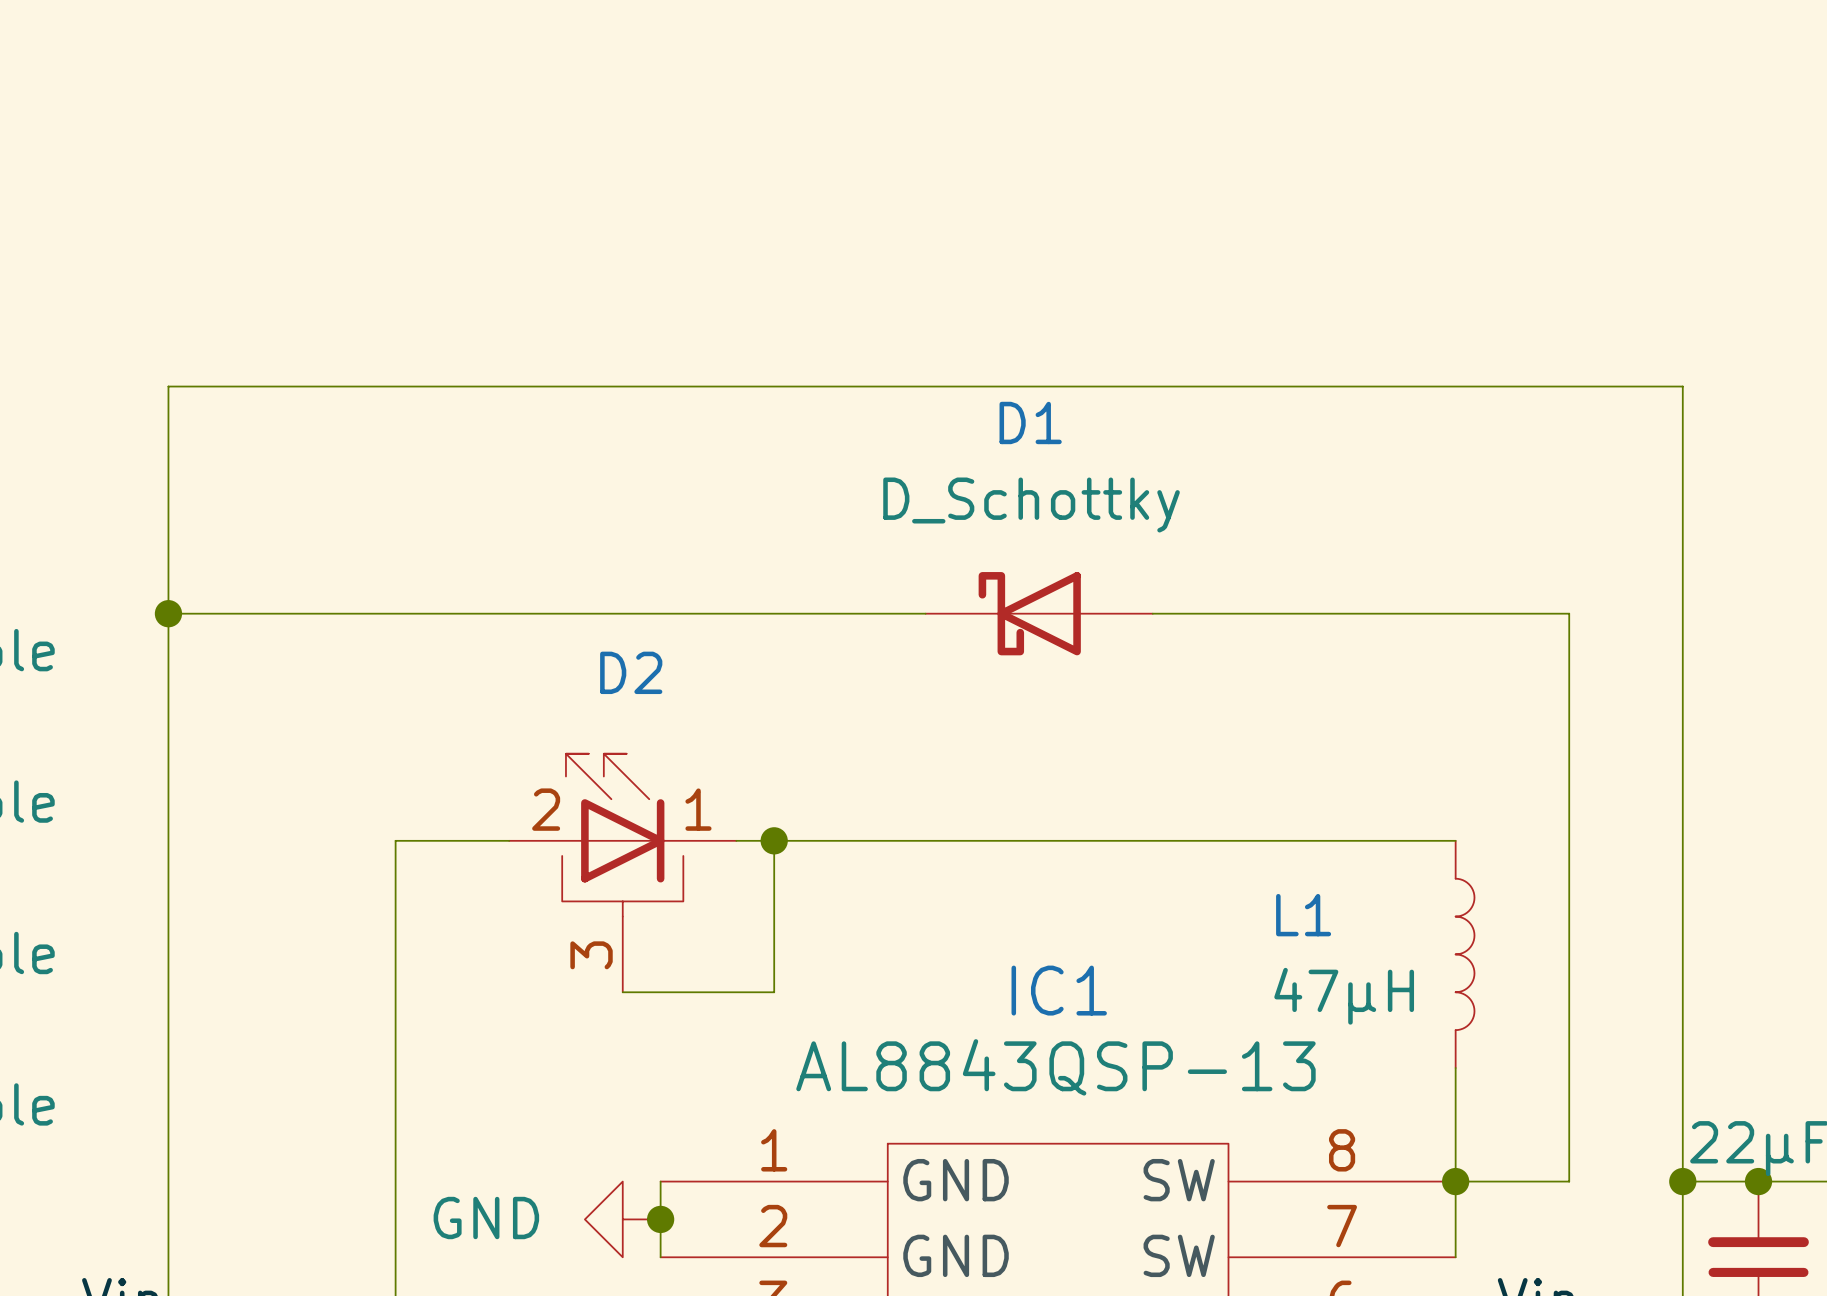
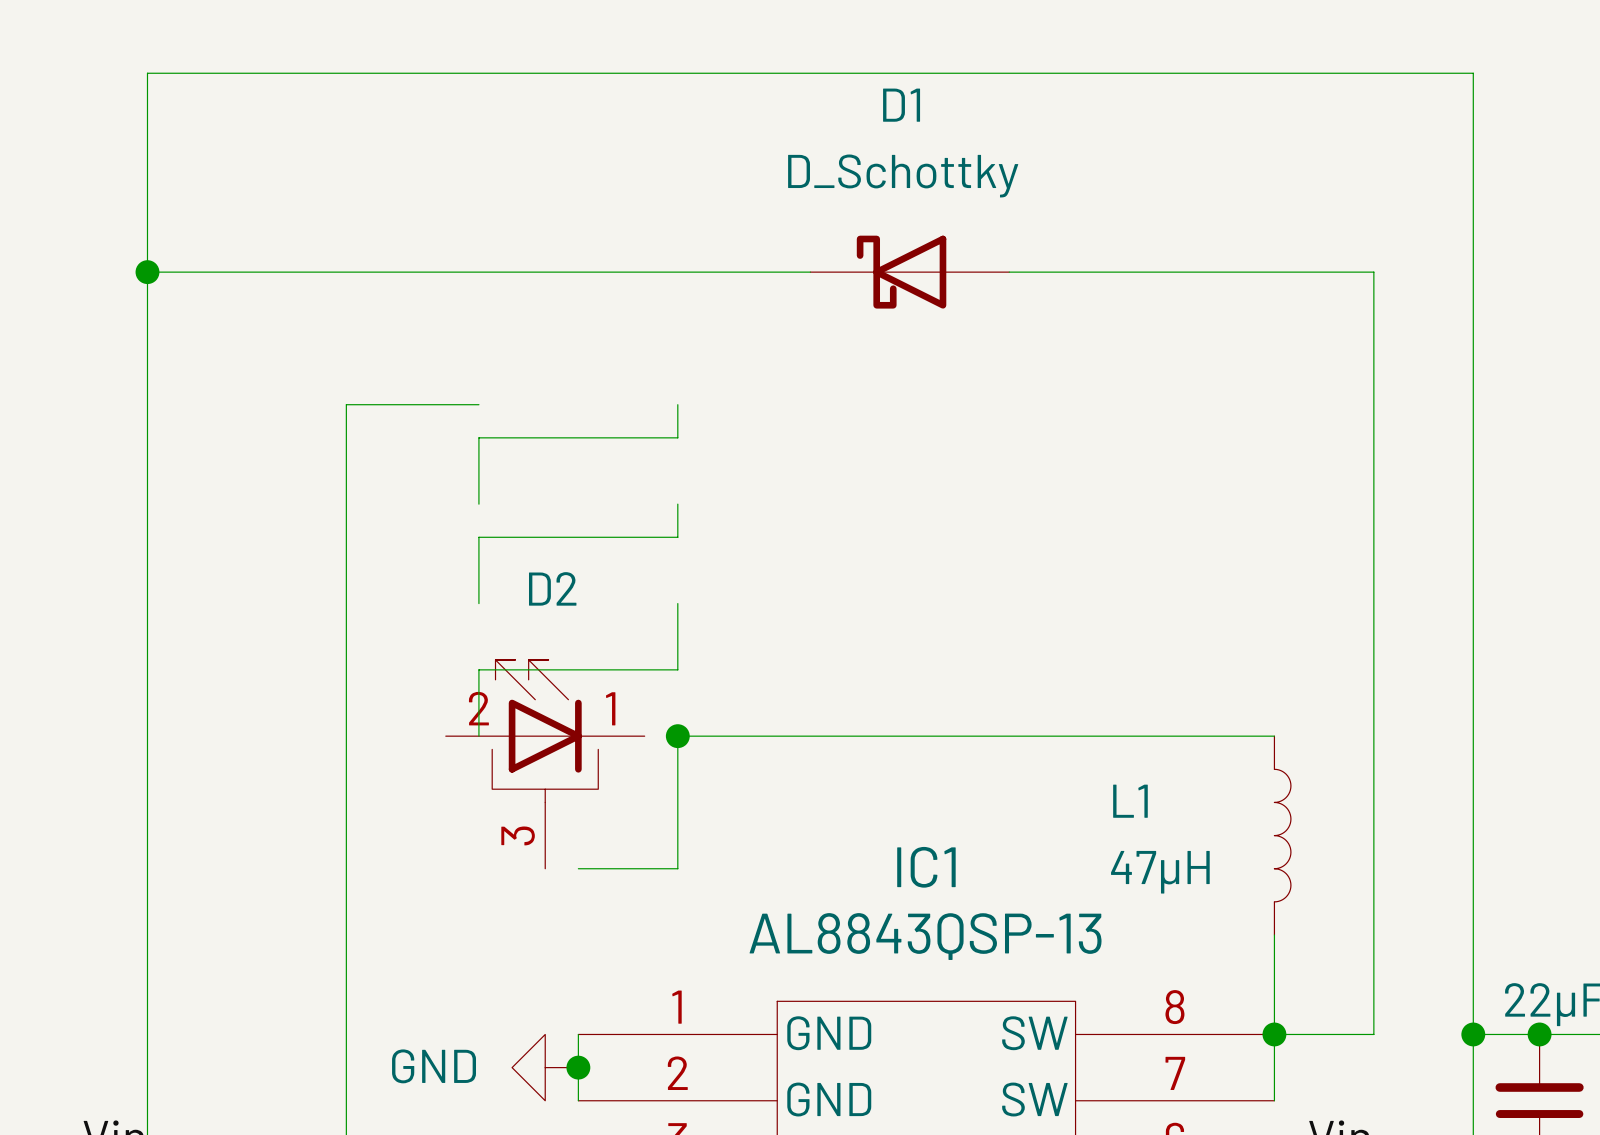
wire: none -> (147, 272) (810, 272)
junction: none -> (147, 272)
wire: (168, 386) (1682, 386) -> (147, 338) (147, 73) (1473, 73) (1473, 338)
wire: none -> (677, 404) (677, 437) (478, 437) (478, 504)
wire: (168, 613) (547, 613) -> (478, 603) (478, 537)
junction: (168, 613) -> none
wire: (774, 613) (925, 613) -> (677, 537) (677, 504)
D1 position: (1039, 613) -> (909, 272)
wire: (1152, 613) (1569, 613) -> (1009, 272) (1373, 272) (1373, 537)
wire: none -> (677, 603) (677, 669) (478, 669) (478, 736)
wire: (395, 840) (509, 840) -> (346, 736) (346, 404) (478, 404)
wire: (736, 840) (774, 840) -> none
wire: (622, 992) (660, 992) -> none

